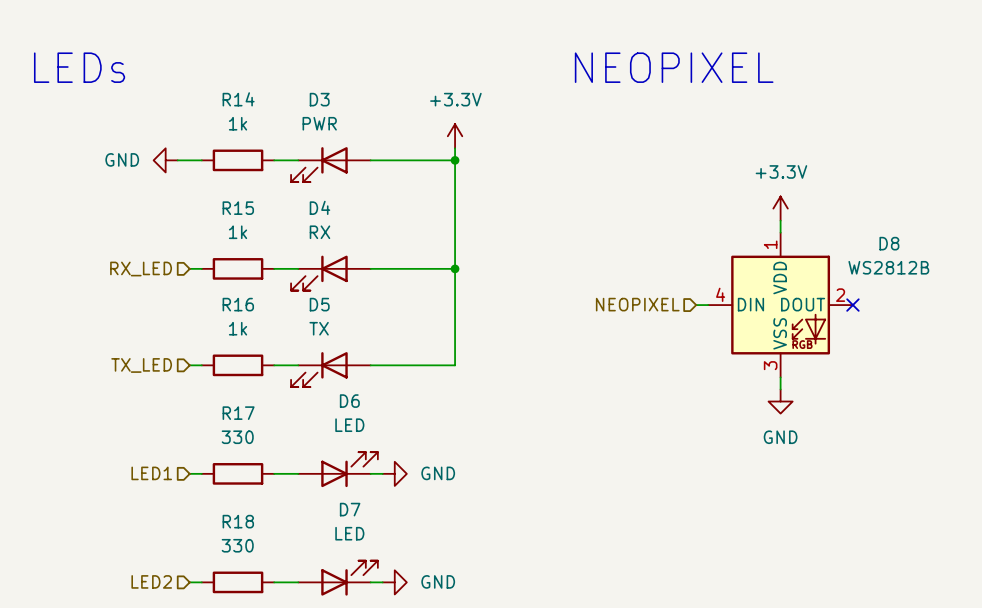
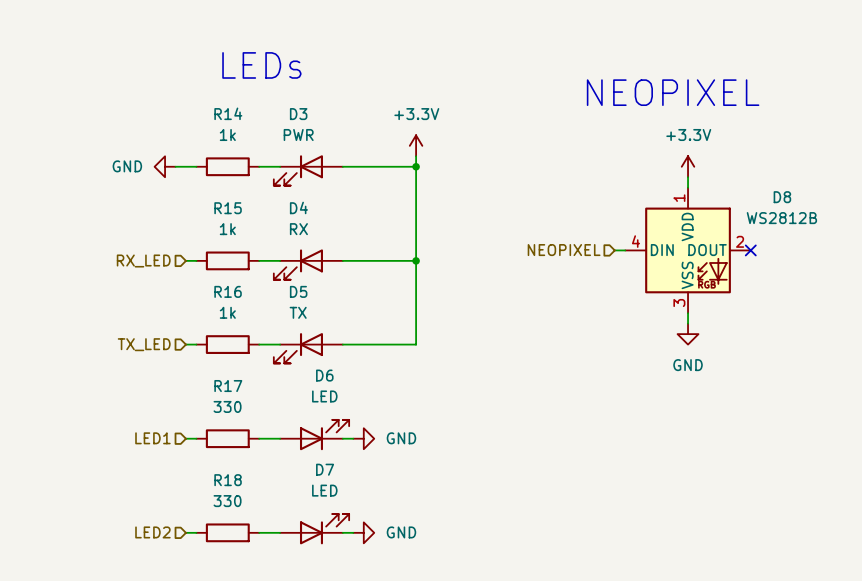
text position: LEDs (79, 67) -> LEDs (261, 65)
text position: NEOPIXEL (674, 67) -> NEOPIXEL (673, 92)
power symbol position: +3.3V (780, 208) -> +3.3V (688, 166)
hierarchical label position: NEOPIXEL (637, 304) -> NEOPIXEL (564, 250)
wire: (696, 305) (708, 305) -> (614, 250) (625, 250)
D8 position: (780, 305) -> (688, 250)
no-connect mark position: (852, 305) -> (750, 250)
power symbol position: GND (780, 401) -> GND (688, 334)

